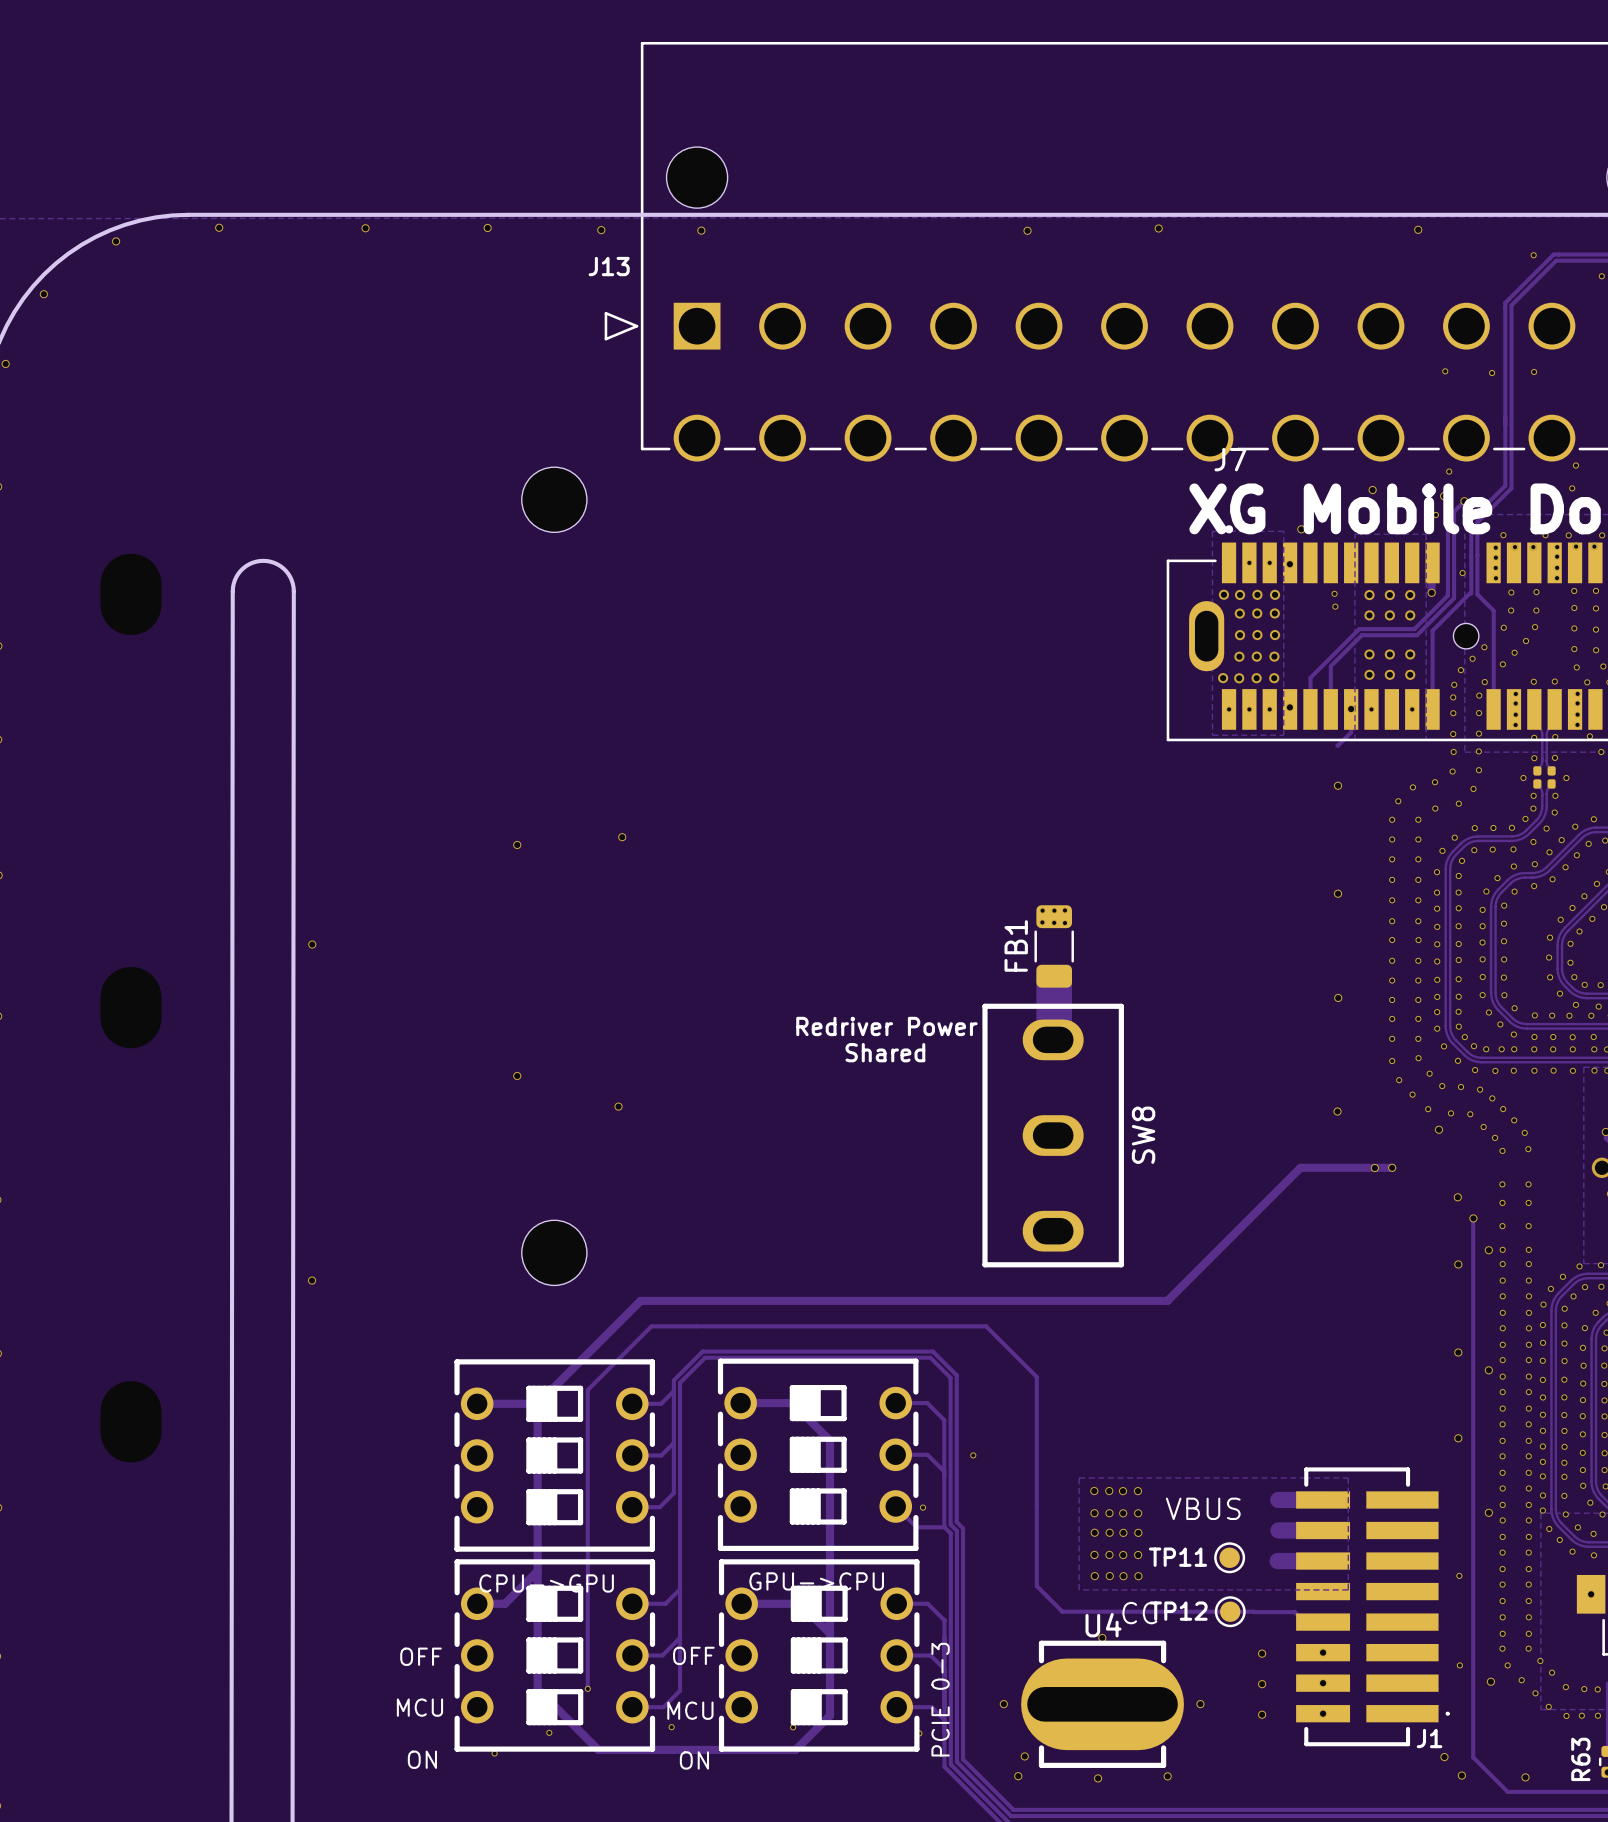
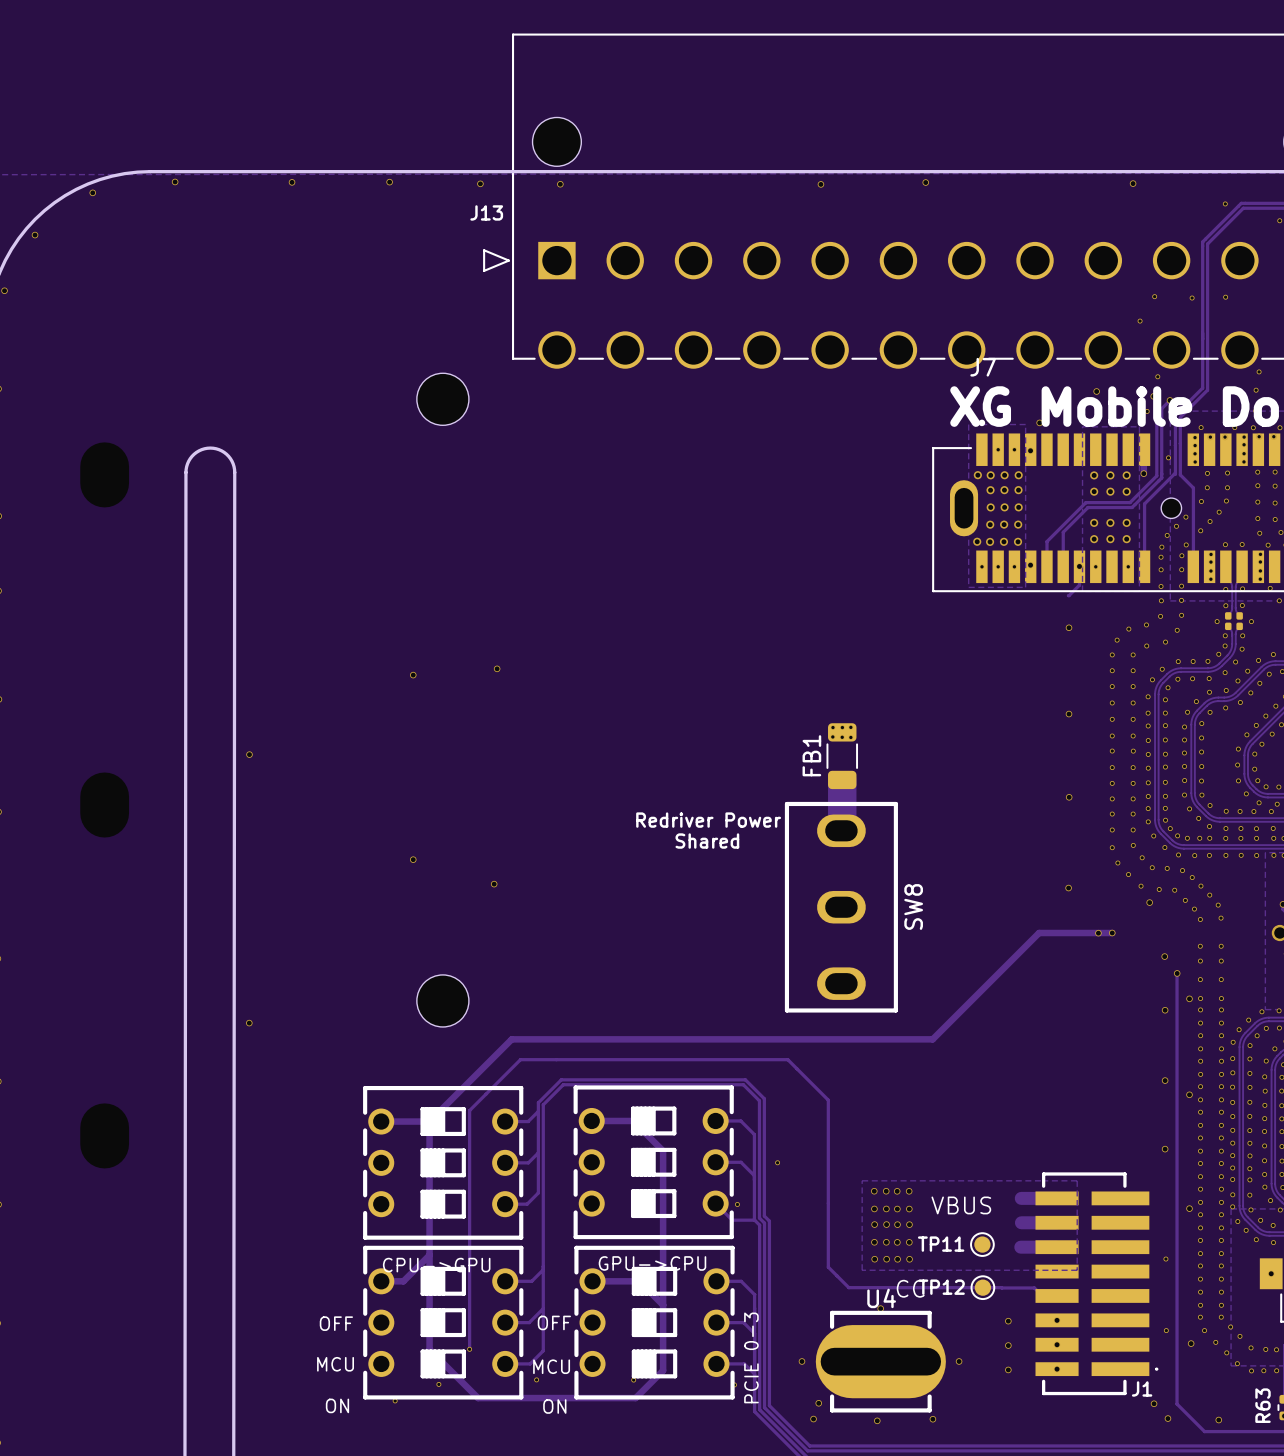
via: none -> (1140, 321)
via: (1334, 593) -> none
via: (1335, 606) -> none

